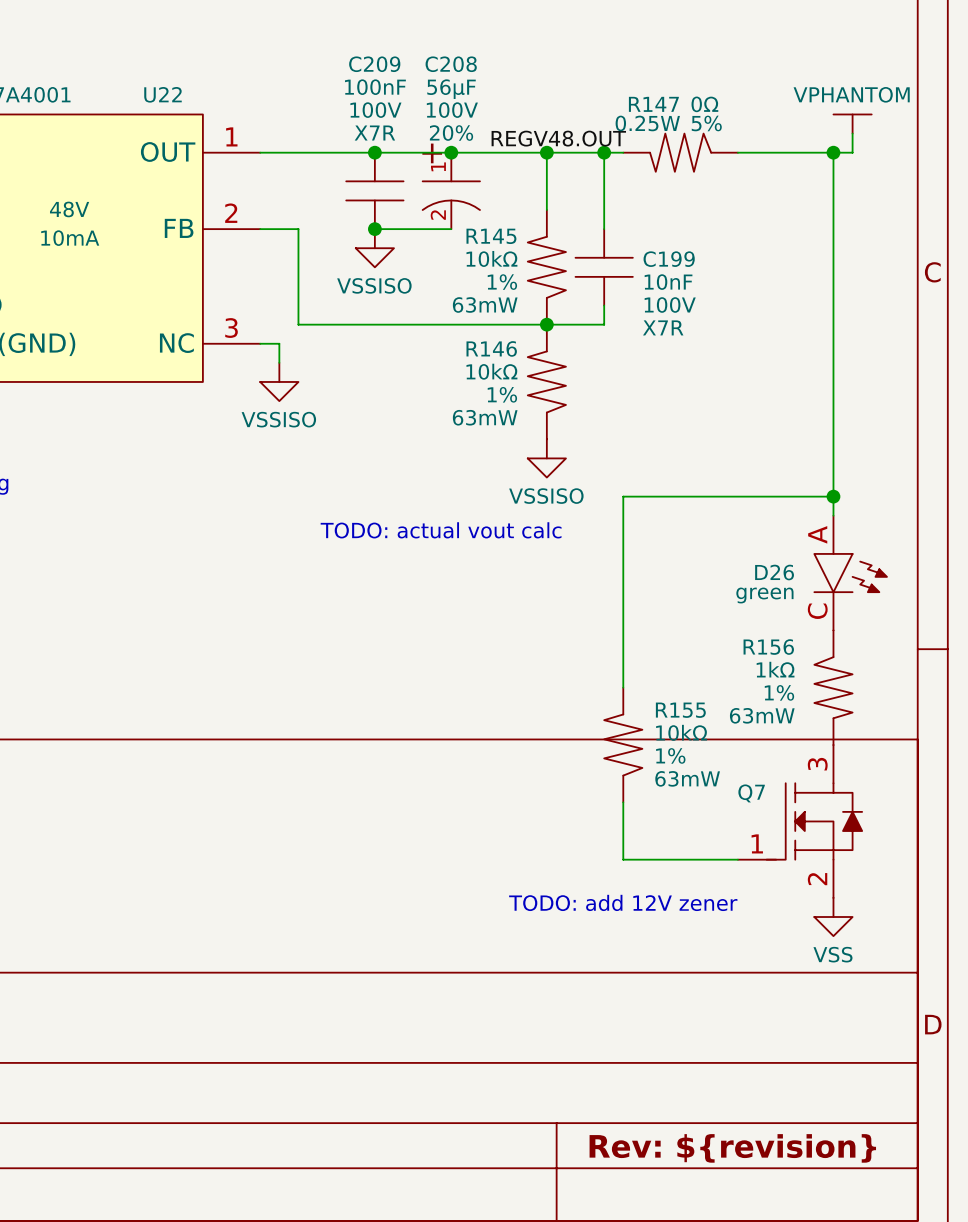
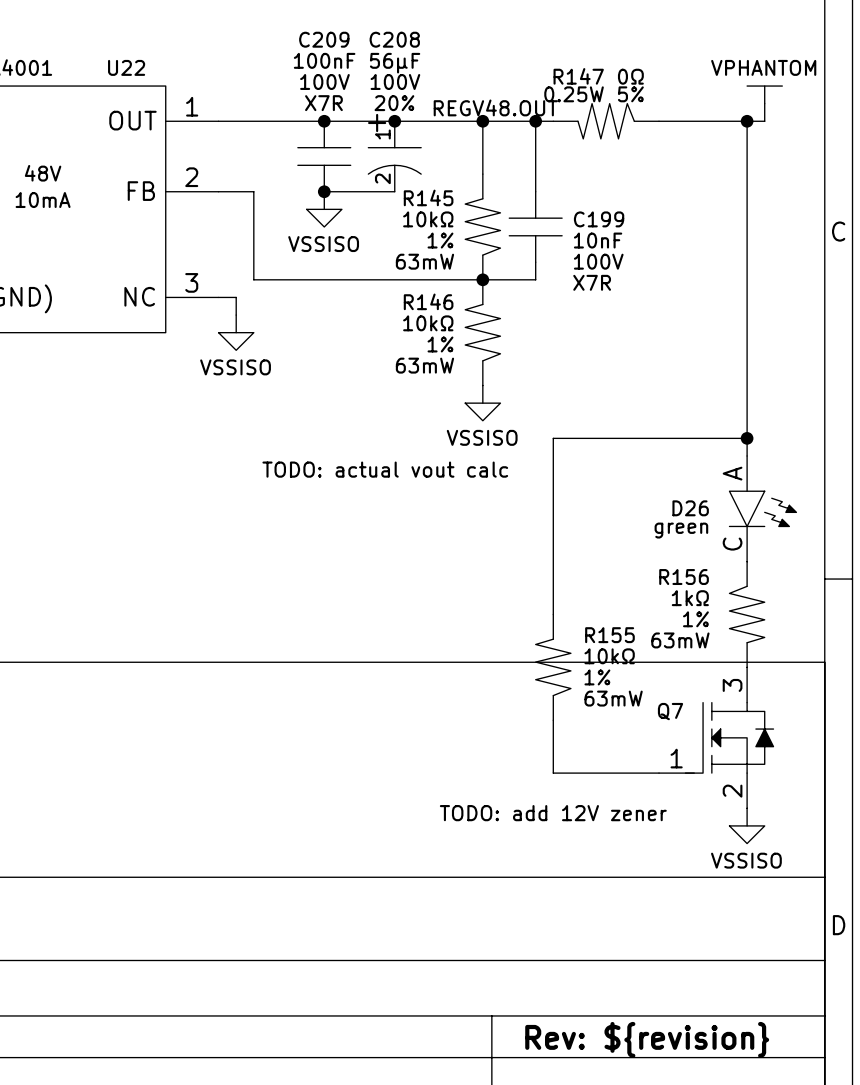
power symbol: VSS (833, 917) -> VSSISO (747, 825)

